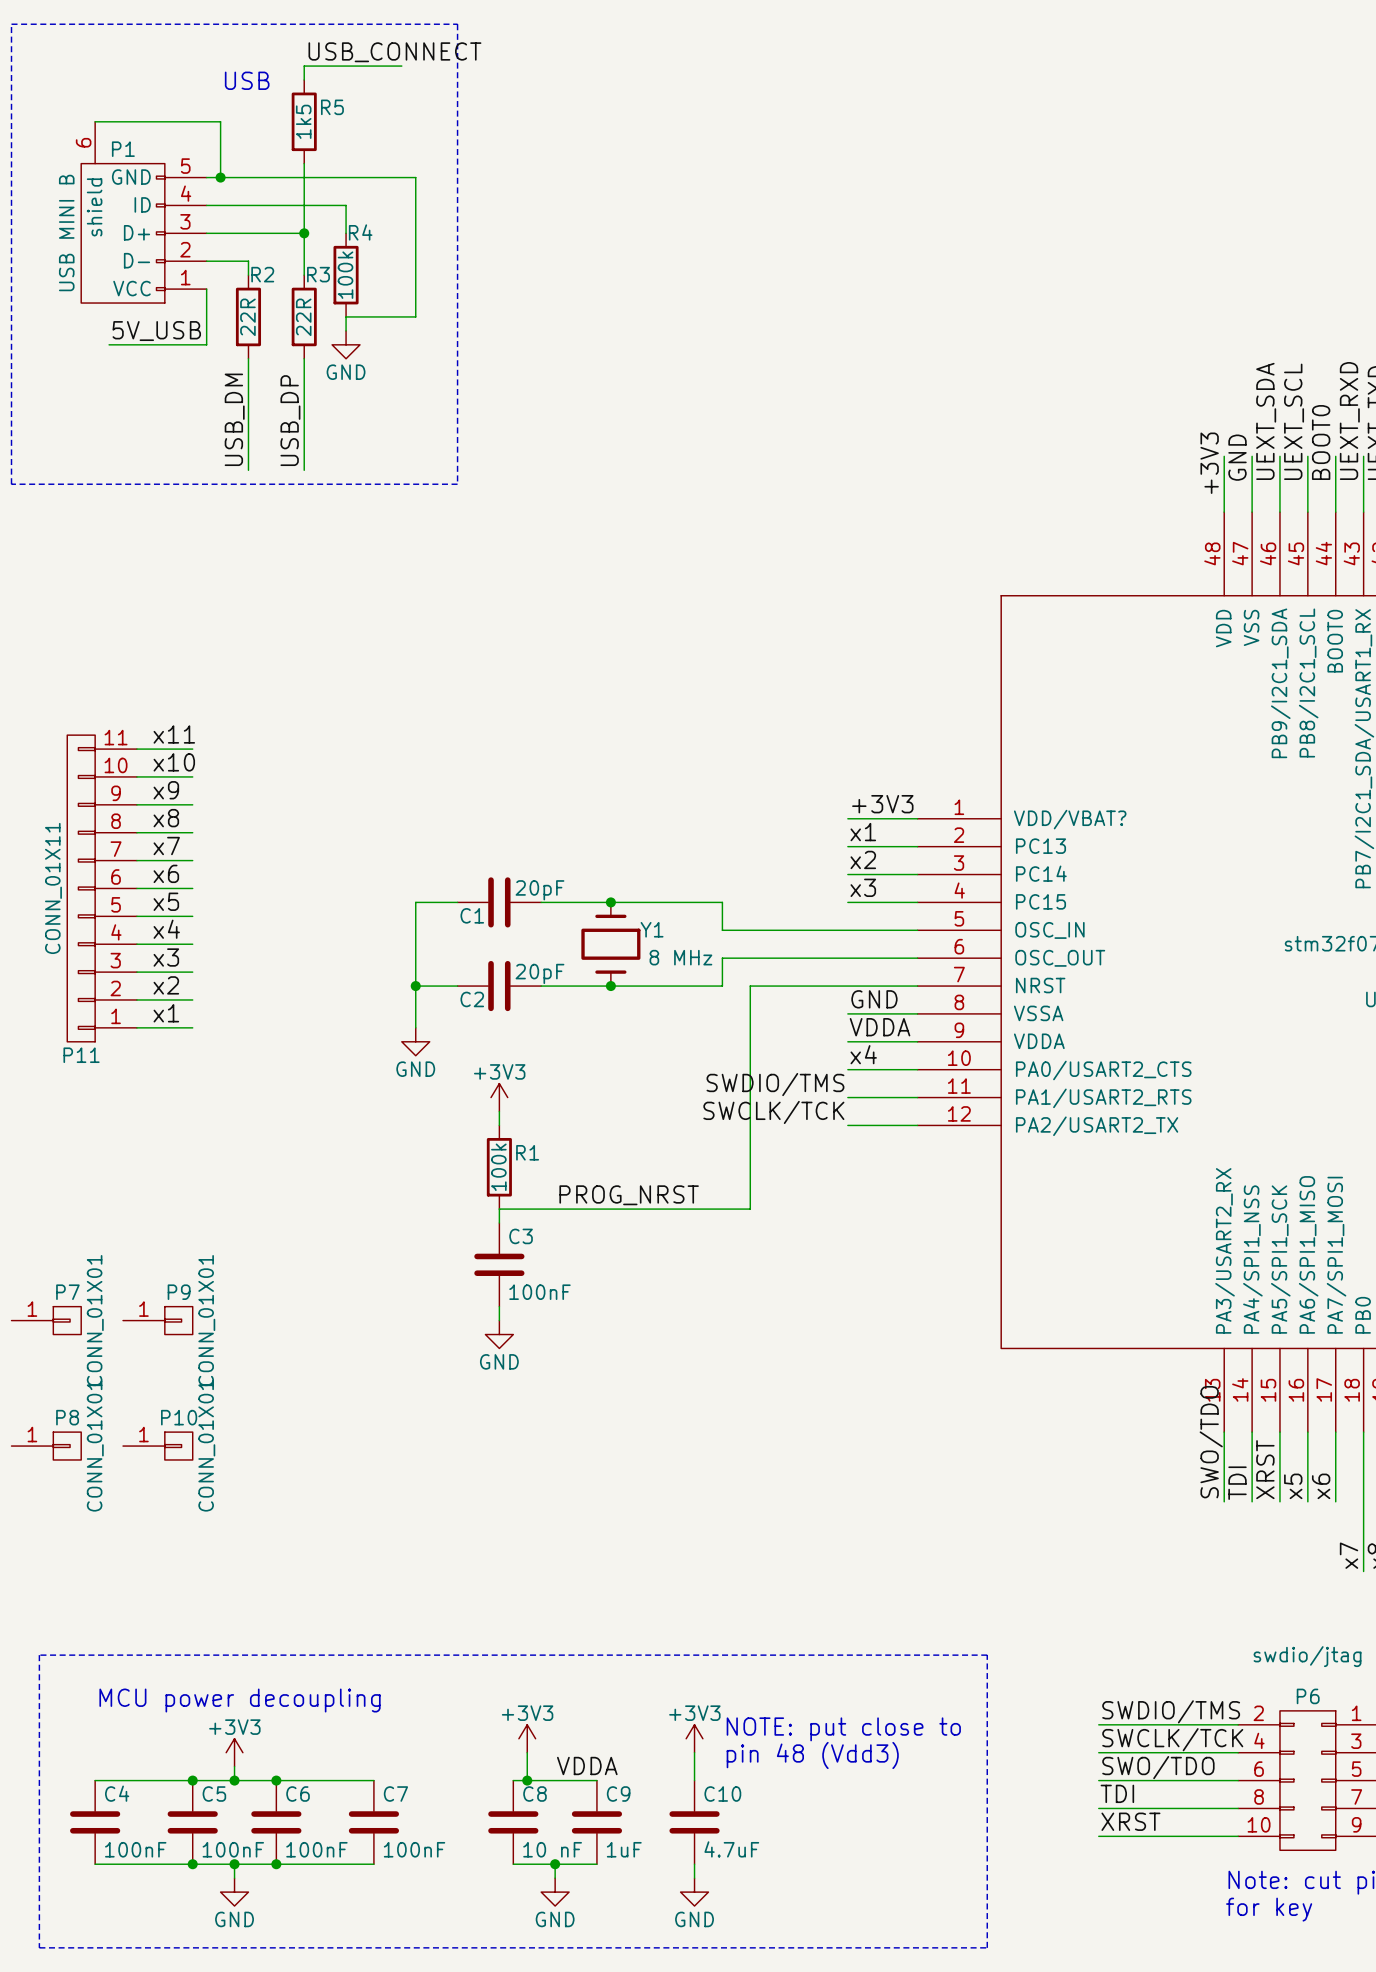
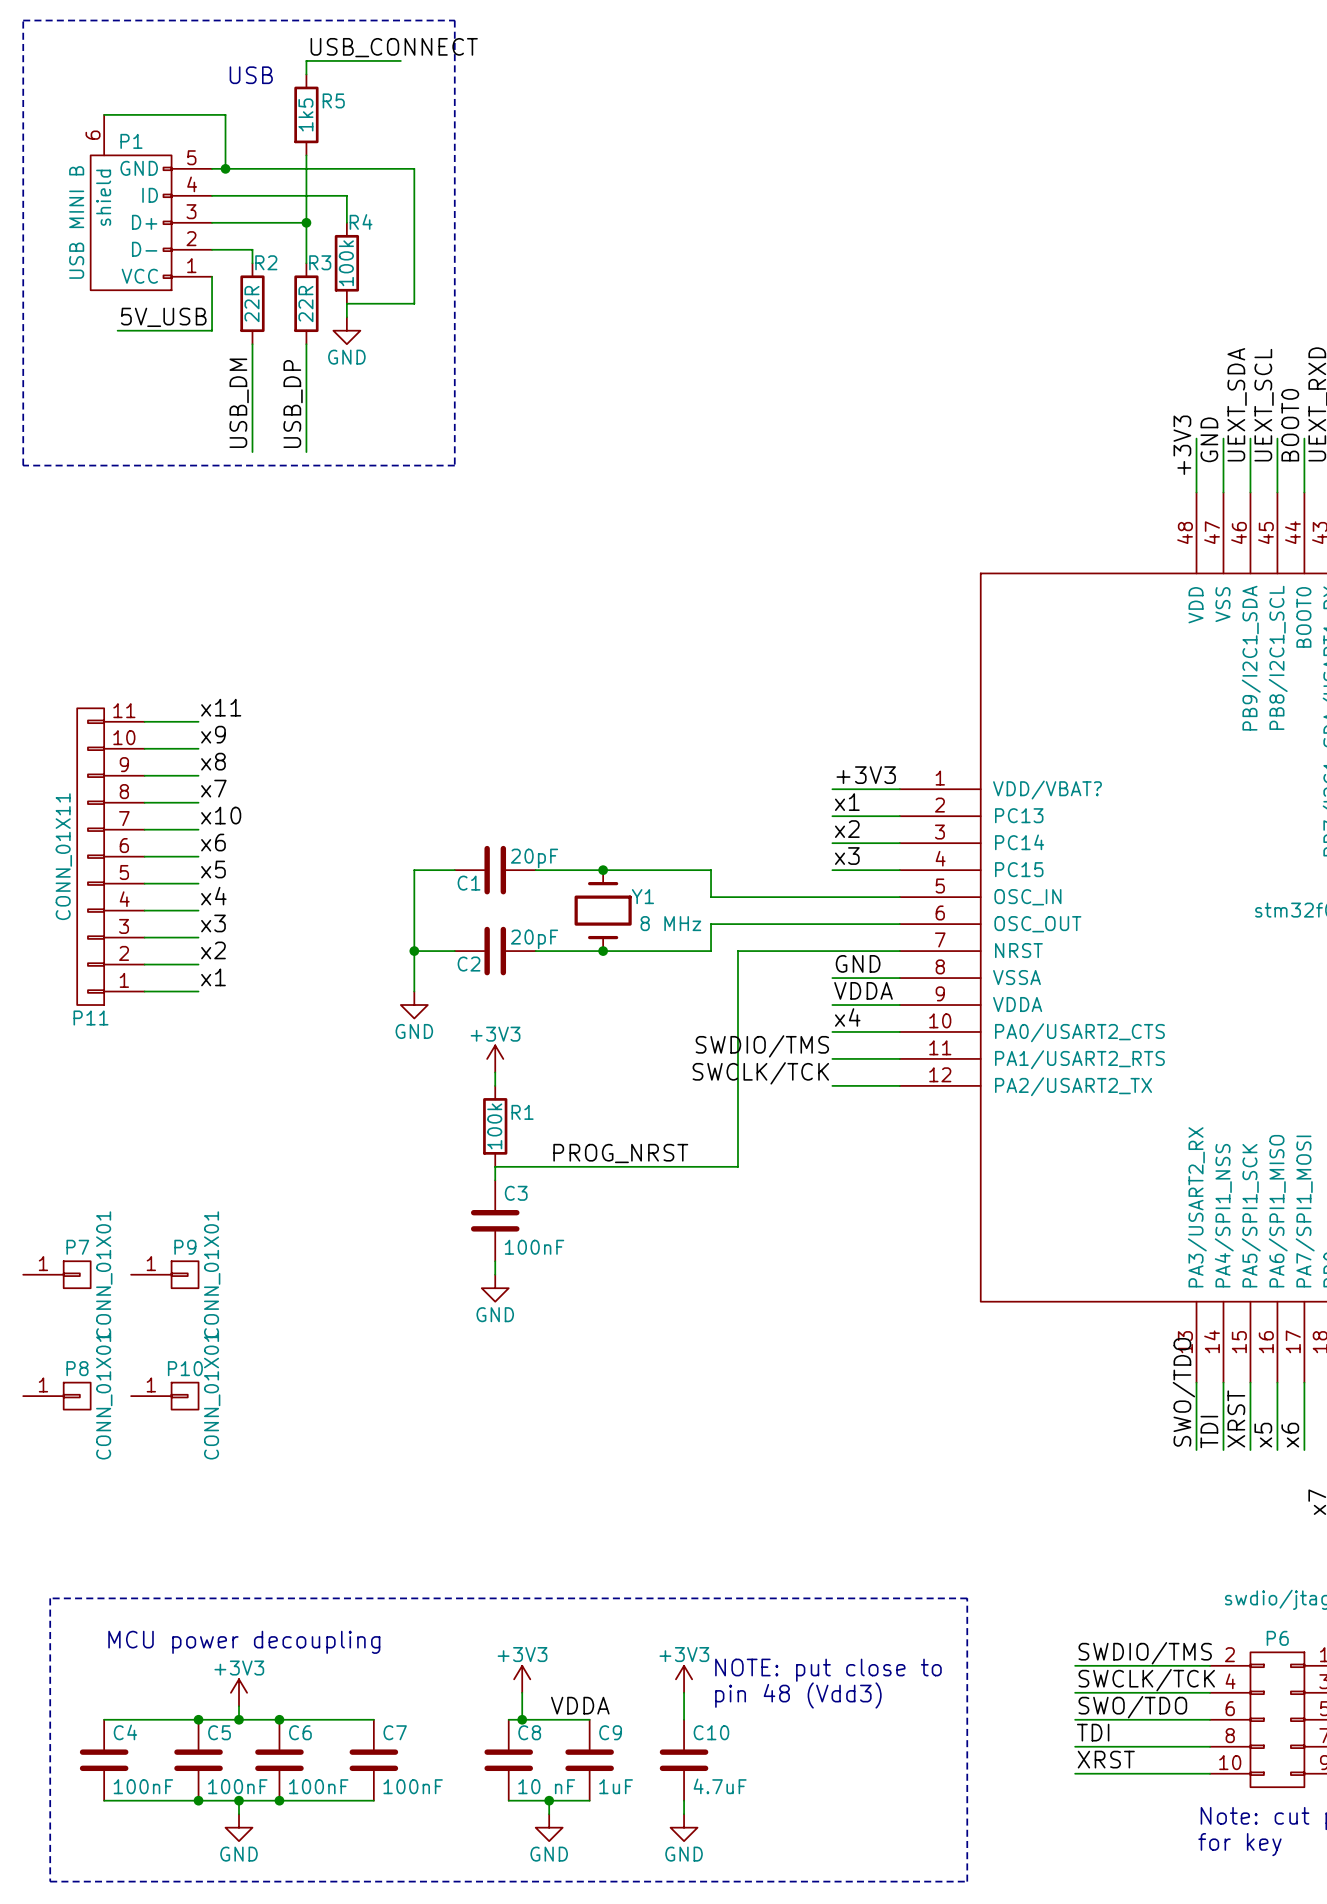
label position: x11 (174, 734) -> x11 (221, 707)
label position: x10 (174, 762) -> x10 (221, 815)
label position: x9 (166, 790) -> x9 (213, 734)
label position: x8 (166, 818) -> x8 (213, 761)
label position: x7 (166, 846) -> x7 (213, 788)
label position: x6 (166, 873) -> x6 (213, 842)
label position: x5 (166, 901) -> x5 (213, 869)
label position: x4 (166, 929) -> x4 (213, 896)
label position: x3 (166, 957) -> x3 (213, 923)
label position: x2 (166, 985) -> x2 (213, 950)
label position: x1 (166, 1013) -> x1 (213, 977)

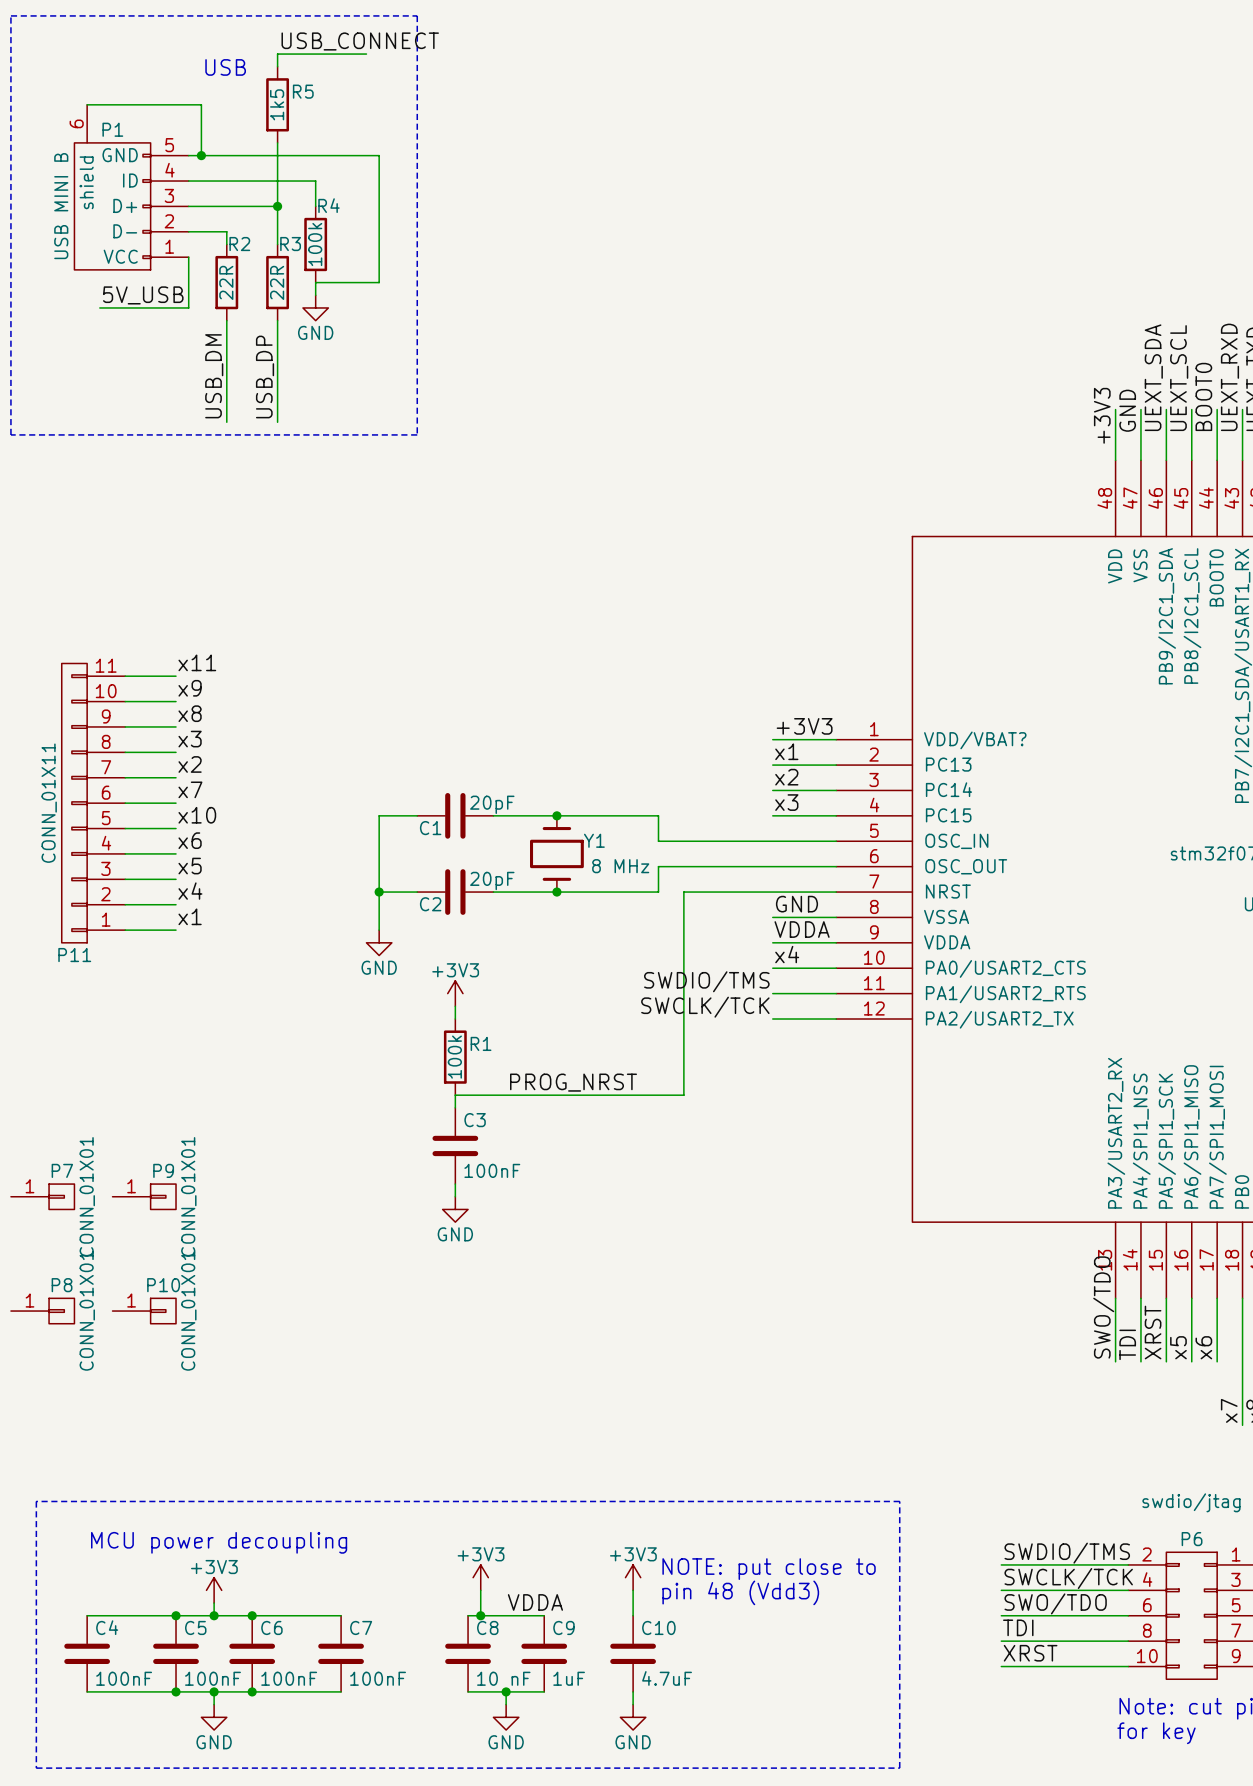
label: x7 (213, 788) -> x3 (190, 739)
label: x10 (221, 815) -> x2 (190, 764)
label: x6 (213, 842) -> x7 (190, 789)
label: x5 (213, 869) -> x10 (197, 815)
label: x4 (213, 896) -> x6 (190, 840)
label: x3 (213, 923) -> x5 (190, 866)
label: x2 (213, 950) -> x4 (190, 891)

